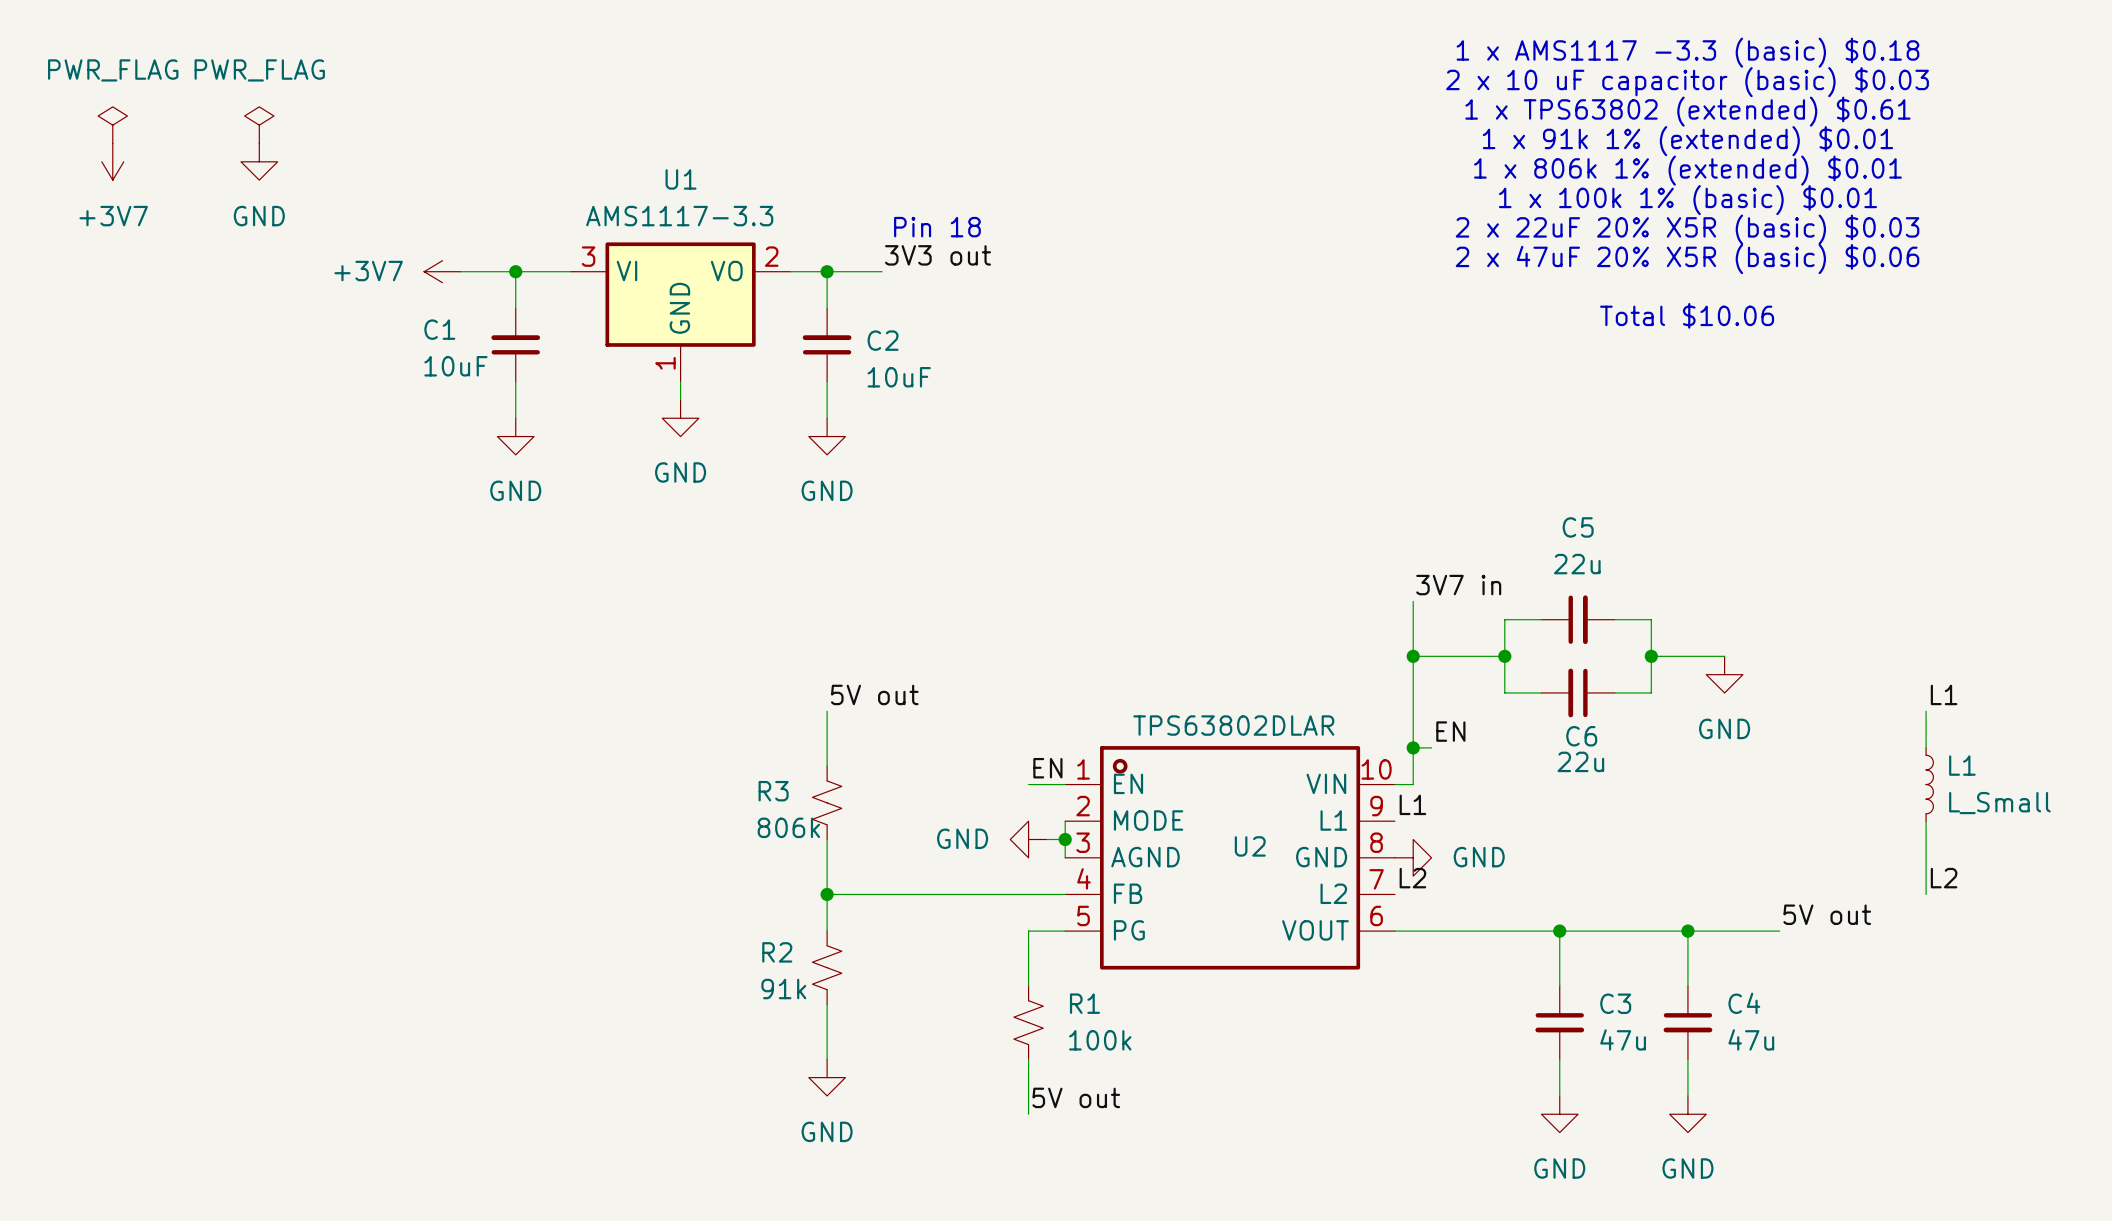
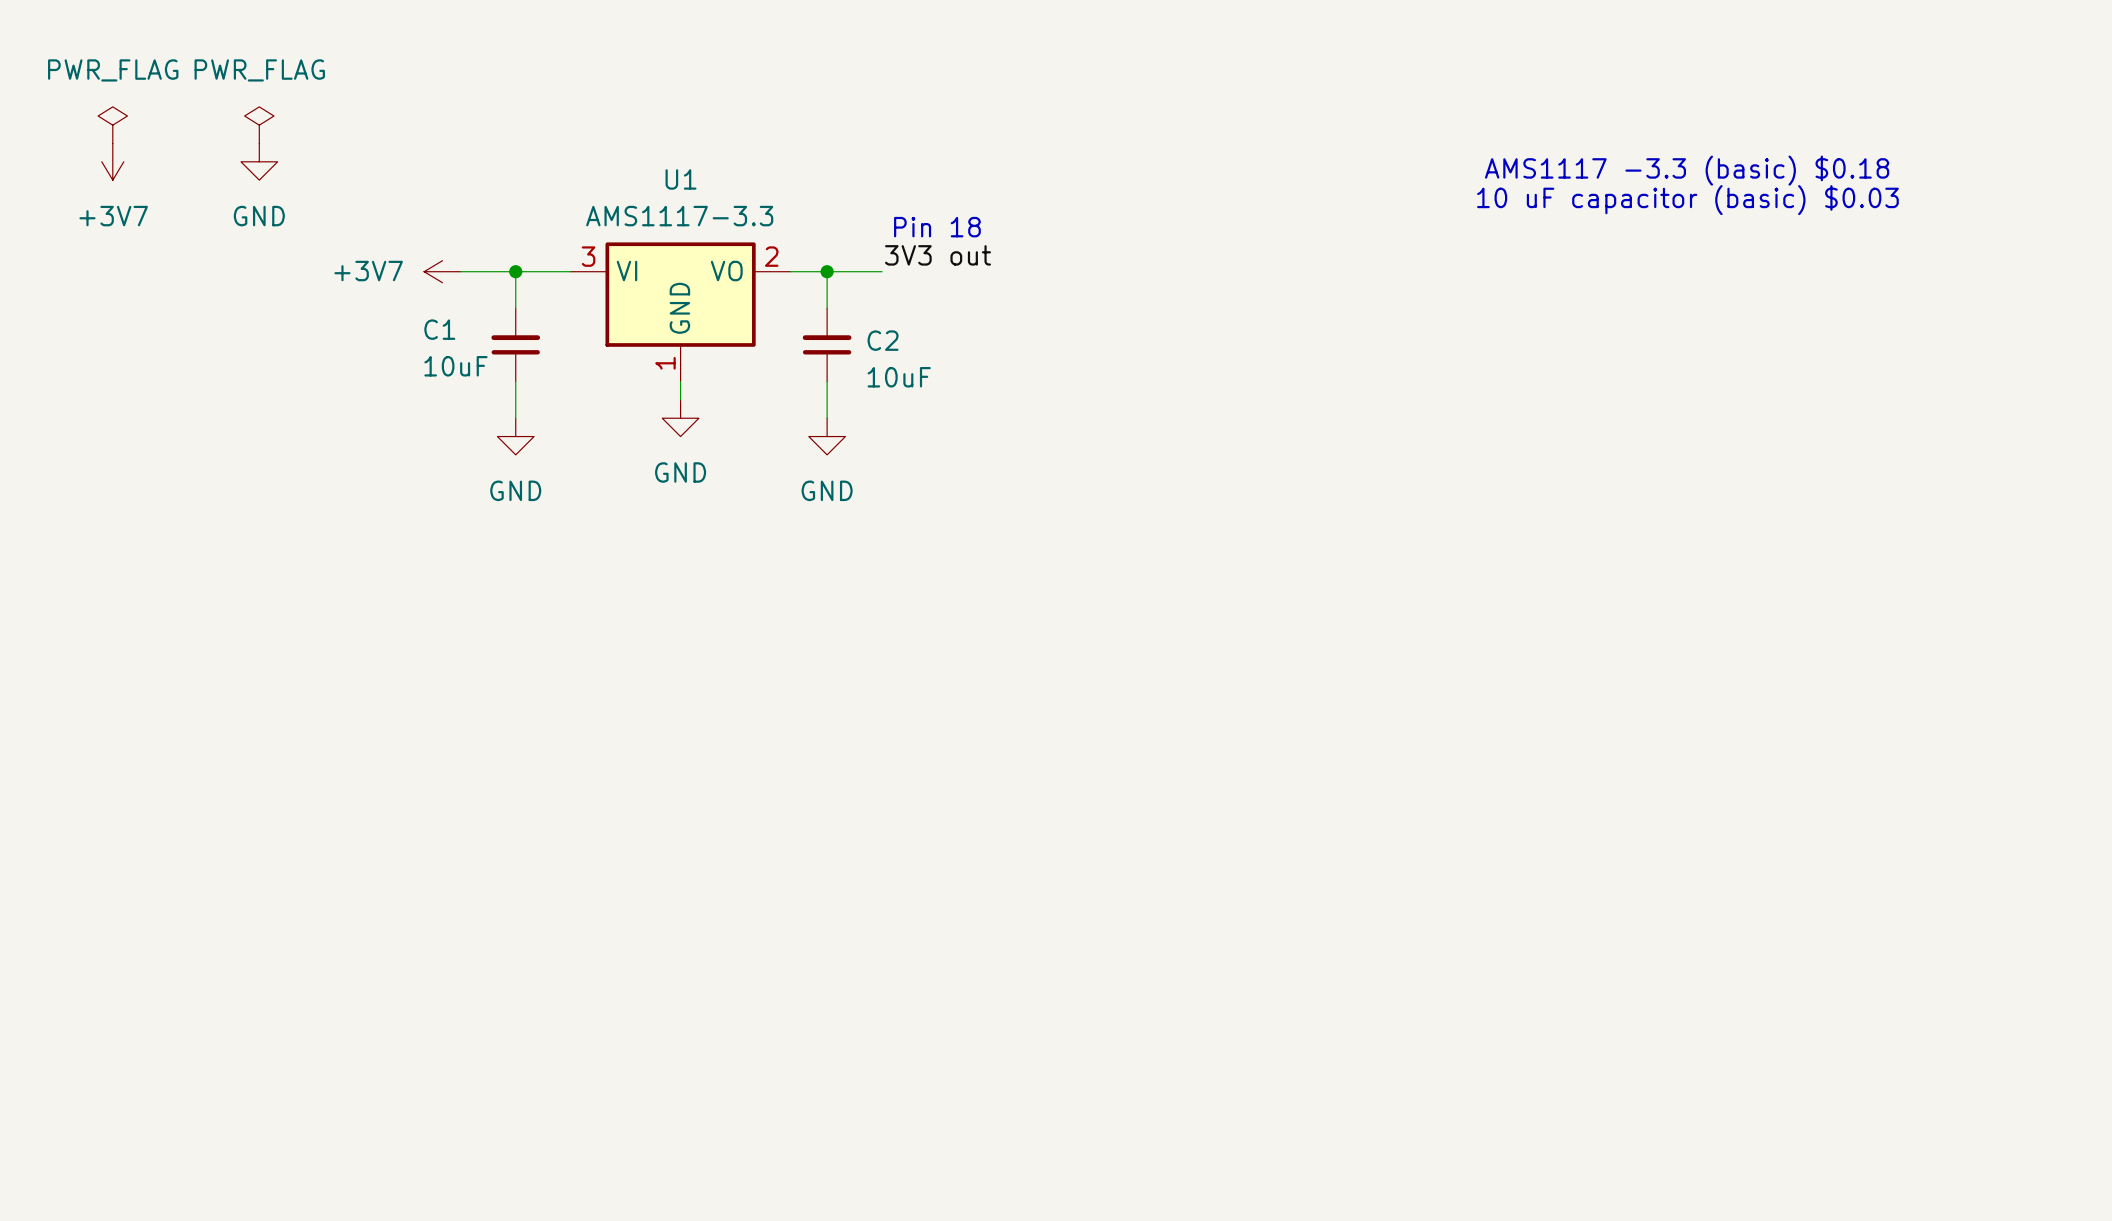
text: 1 x AMS1117 -3.3 (basic) $0.18 (1687, 52) -> none
text: 2 x 10 uF capacitor (basic) $0.03 (1687, 82) -> none
text: 1 x TPS63802 (extended) $0.61 (1687, 111) -> none
text: 1 x 91k 1% (extended) $0.01 (1687, 141) -> none
text: 1 x 806k 1% (extended) $0.01 (1687, 170) -> AMS1117 -3.3 (basic) $0.18 (1687, 170)
text: 1 x 100k 1% (basic) $0.01 (1687, 200) -> 10 uF capacitor (basic) $0.03 (1687, 200)
text: 2 x 22uF 20% X5R (basic) $0.03 (1687, 229) -> none
text: 2 x 47uF 20% X5R (basic) $0.06 (1687, 259) -> none
text: Total $10.06 (1687, 315) -> none
label: 3V7 in (1458, 585) -> none
wire: (1413, 601) (1413, 784) (1394, 784) -> none
wire: (1541, 619) (1504, 619) (1504, 692) (1541, 692) -> none
C5: 22u (1578, 619) -> none
wire: (1614, 619) (1651, 619) (1651, 692) (1614, 692) -> none
wire: (1413, 656) (1504, 656) -> none
junction: (1413, 656) -> none
junction: (1504, 656) -> none
wire: (1651, 656) (1724, 656) -> none
junction: (1651, 656) -> none
power symbol: GND (1724, 674) -> none
C6: 22u (1578, 692) -> none
label: 5V out (874, 694) -> none
label: L1 (1944, 694) -> none
wire: (827, 711) (827, 766) -> none
wire: (1926, 711) (1926, 747) -> none
label: EN (1450, 731) -> none
wire: (1413, 747) (1431, 747) -> none
junction: (1413, 747) -> none
label: EN (1047, 768) -> none
wire: (1028, 784) (1065, 784) -> none
L1: L_Small (1929, 784) -> none
R3: 806k (827, 802) -> none
label: L1 (1412, 804) -> none
wire: (1065, 821) (1065, 857) -> none
wire: (1926, 821) (1926, 894) -> none
wire: (827, 839) (827, 931) -> none
power symbol: GND (1028, 839) -> none
wire: (1046, 839) (1065, 839) -> none
junction: (1065, 839) -> none
U2: TPS63802DLAR (1230, 857) -> none
power symbol: GND (1413, 857) -> none
label: L2 (1412, 878) -> none
label: L2 (1944, 878) -> none
wire: (827, 894) (1065, 894) -> none
junction: (827, 894) -> none
label: 5V out (1827, 914) -> none
wire: (1065, 931) (1028, 931) (1028, 986) -> none
wire: (1394, 931) (1779, 931) -> none
wire: (1559, 931) (1559, 986) -> none
junction: (1559, 931) -> none
wire: (1687, 931) (1687, 986) -> none
junction: (1687, 931) -> none
R2: 91k (827, 967) -> none
wire: (827, 1004) (827, 1059) -> none
R1: 100k (1028, 1022) -> none
C3: 47u (1559, 1022) -> none
C4: 47u (1687, 1022) -> none
wire: (1028, 1059) (1028, 1114) -> none
wire: (1559, 1059) (1559, 1095) -> none
wire: (1687, 1059) (1687, 1095) -> none
power symbol: GND (827, 1077) -> none
label: 5V out (1076, 1097) -> none
power symbol: GND (1559, 1114) -> none
power symbol: GND (1687, 1114) -> none

